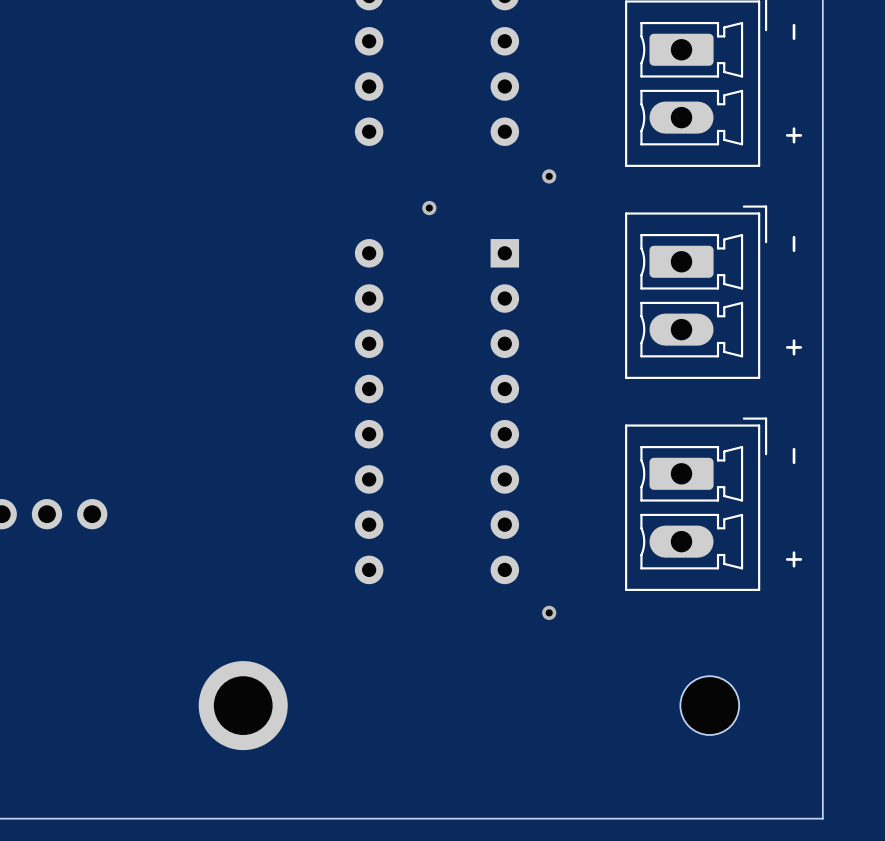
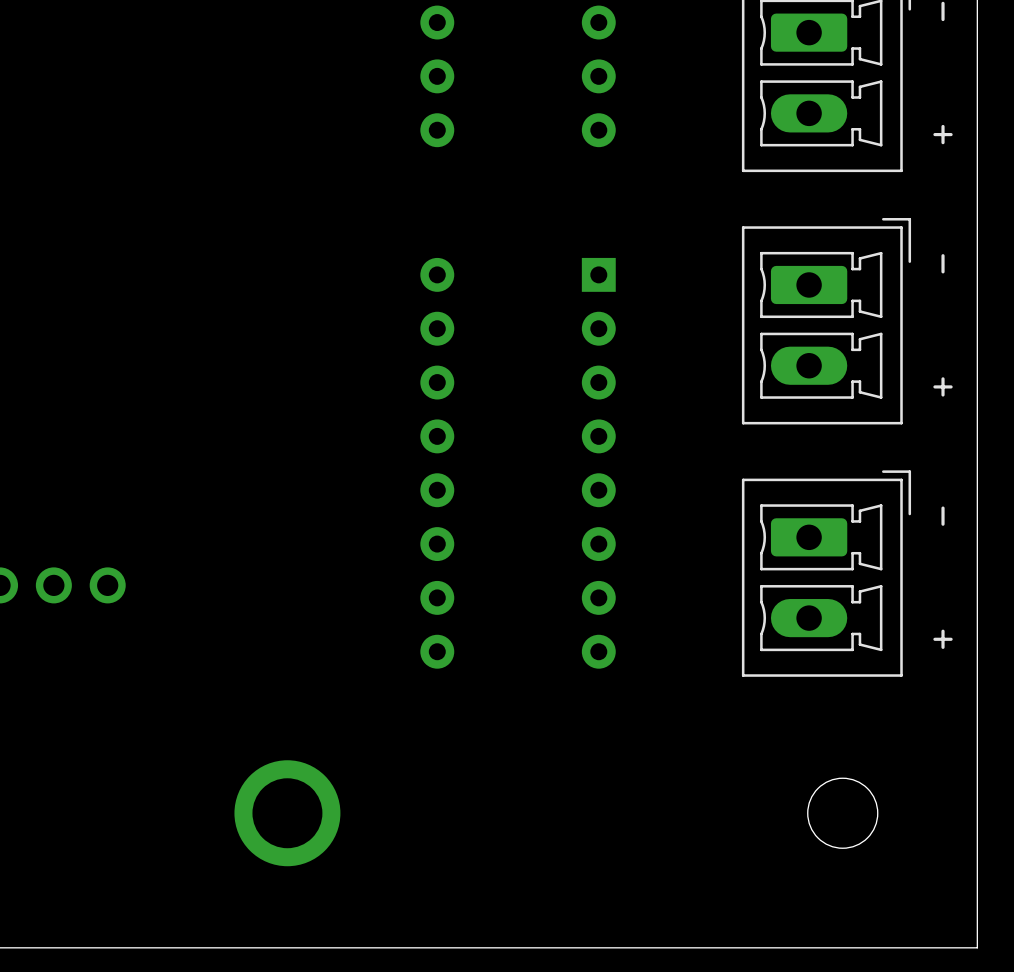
via: (549, 176) -> none
via: (429, 208) -> none
via: (549, 612) -> none

